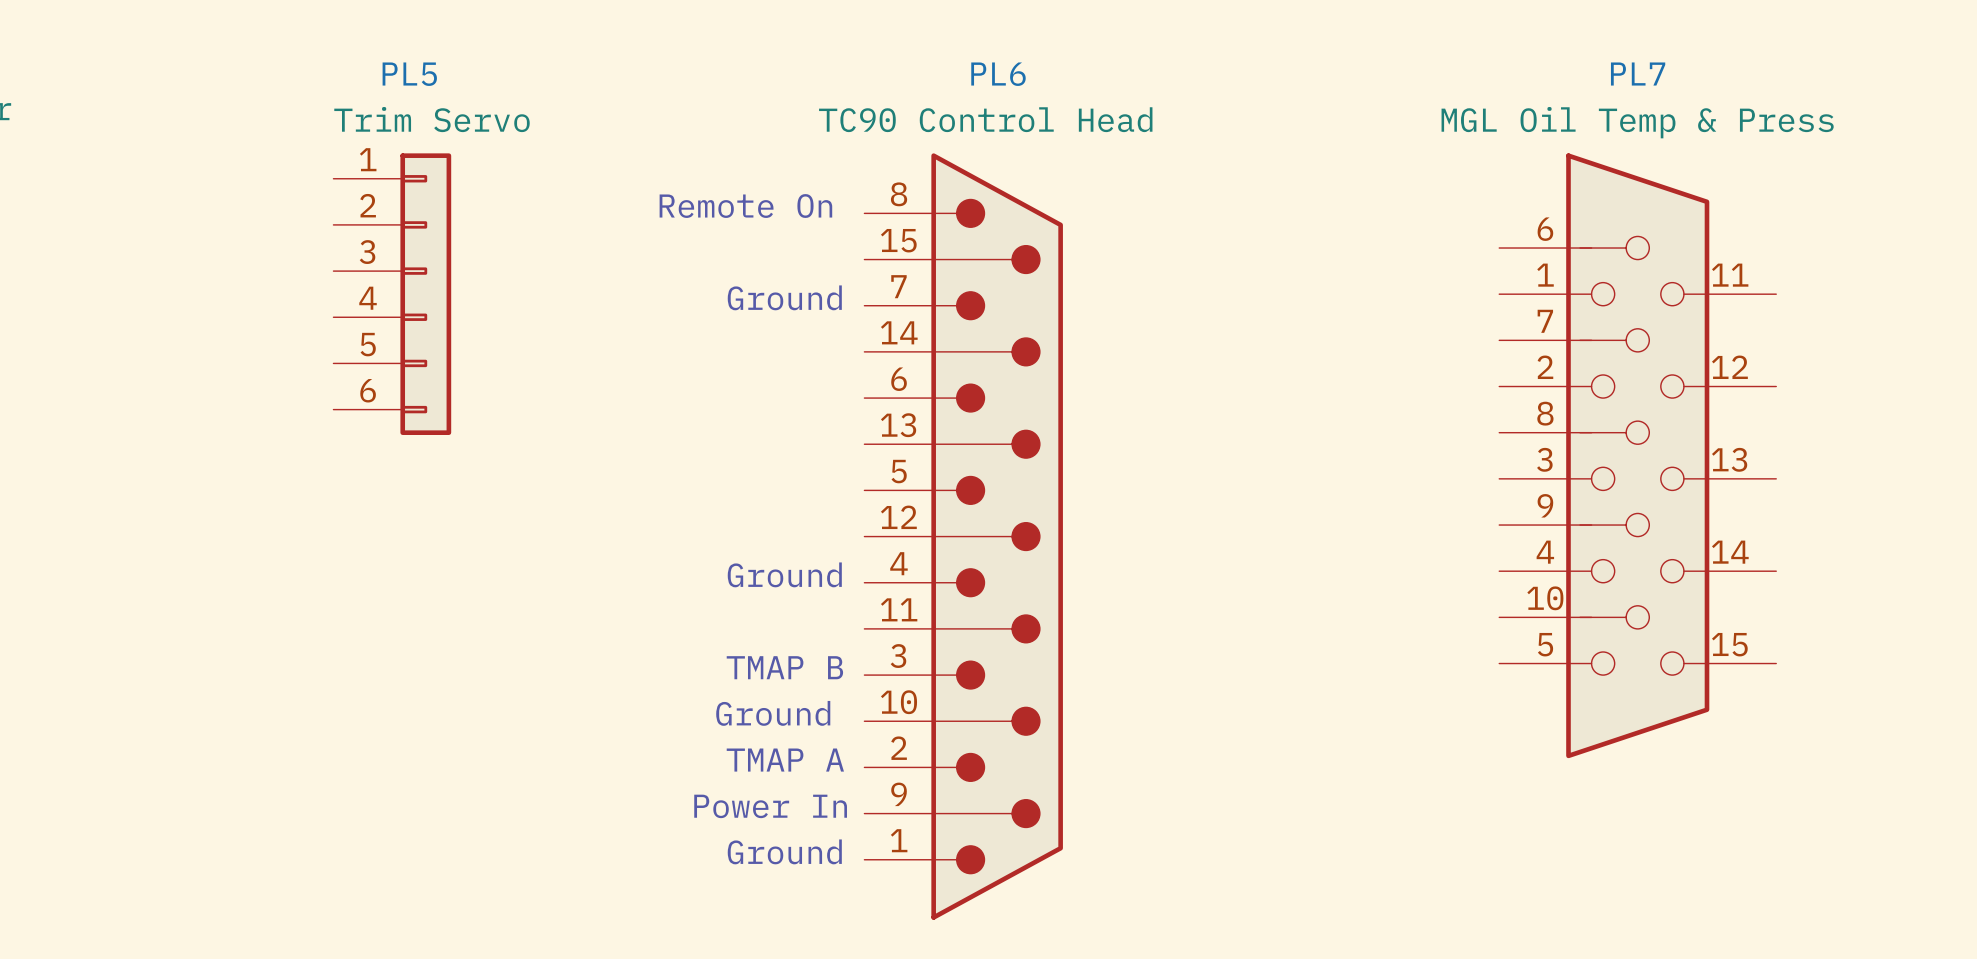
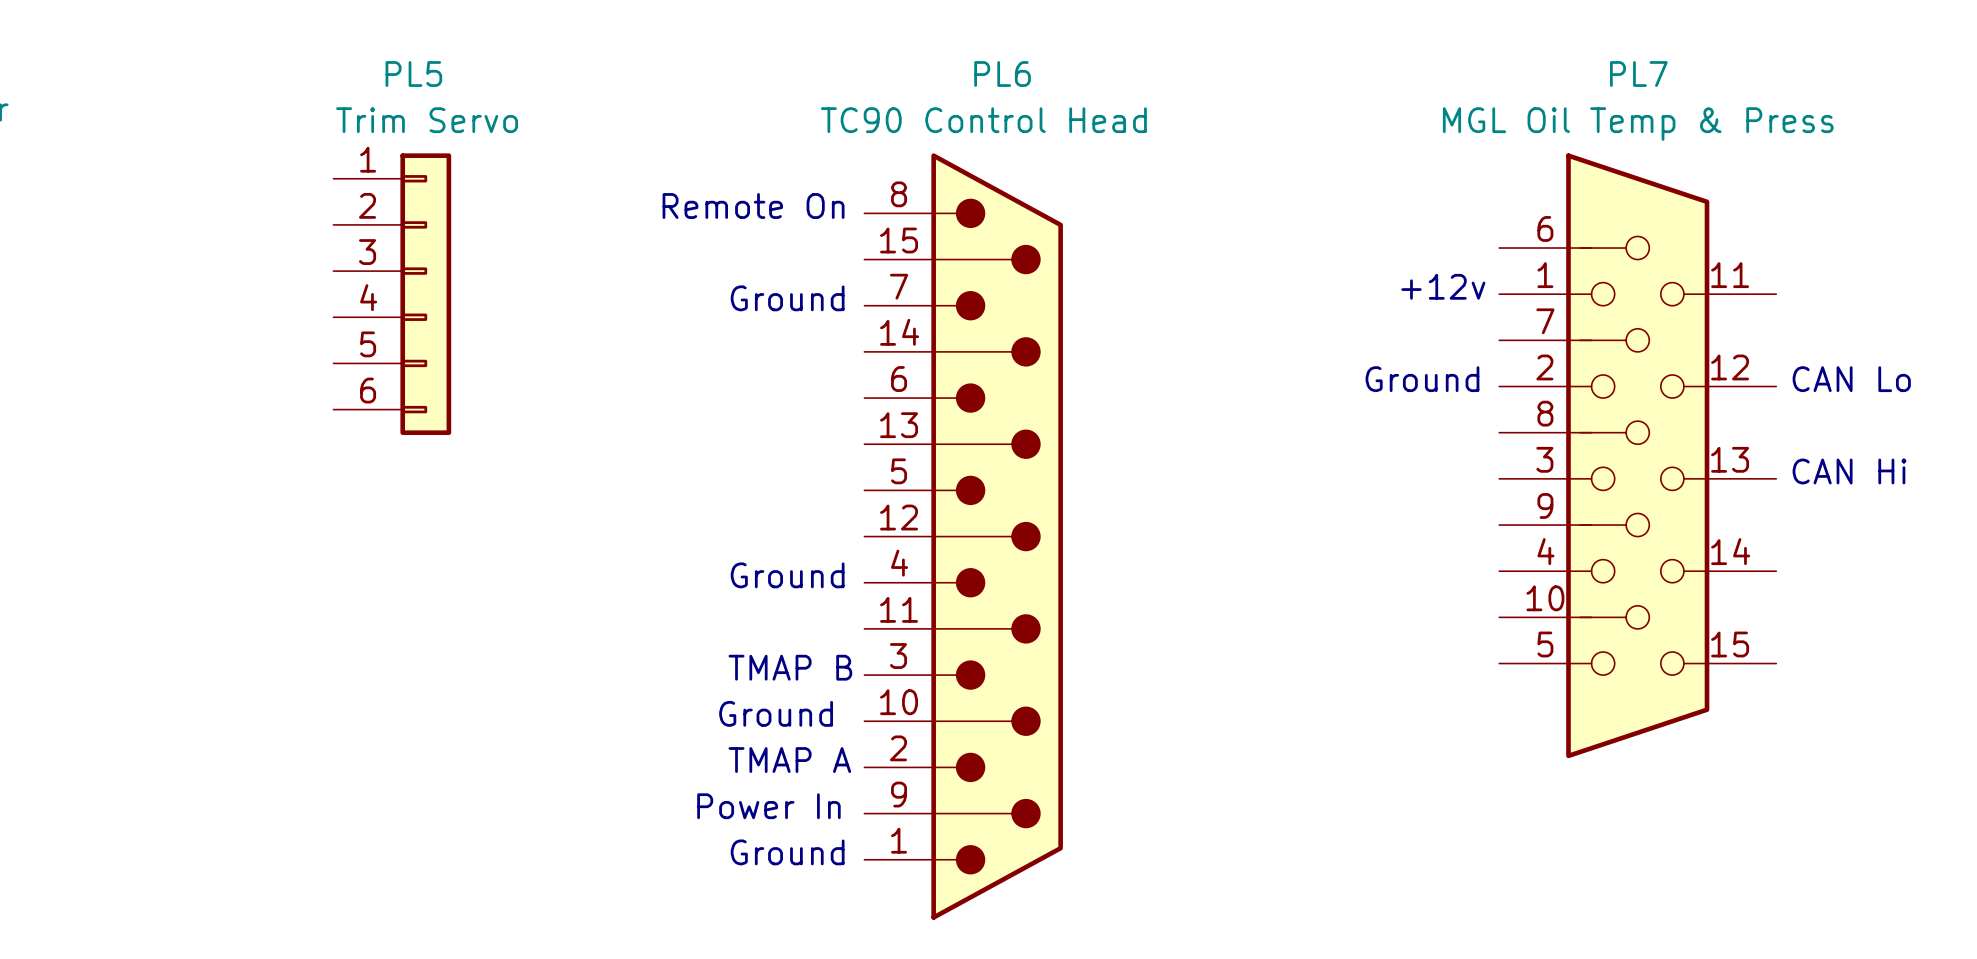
text: none -> +12v (1443, 286)
text: none -> Ground (1422, 379)
text: none -> CAN Lo (1851, 379)
text: none -> CAN Hi (1849, 471)

